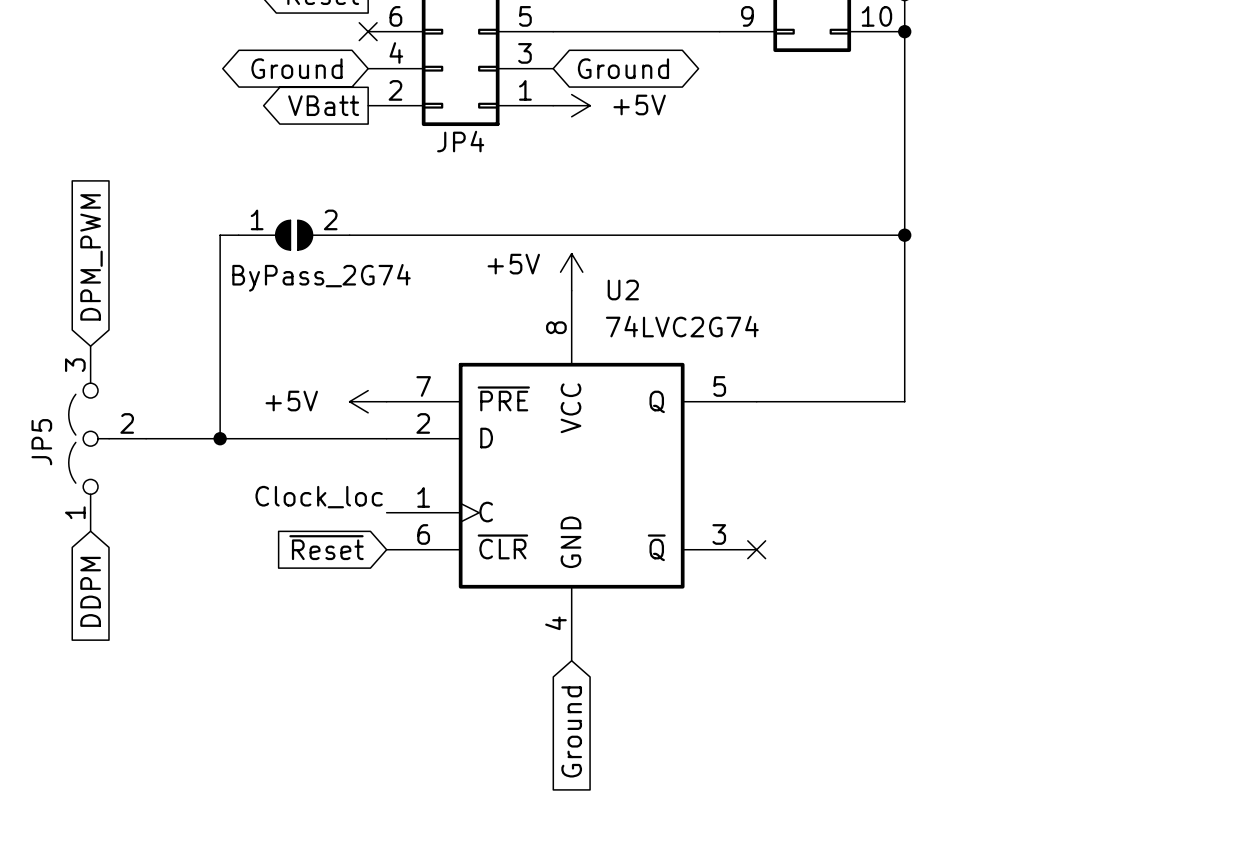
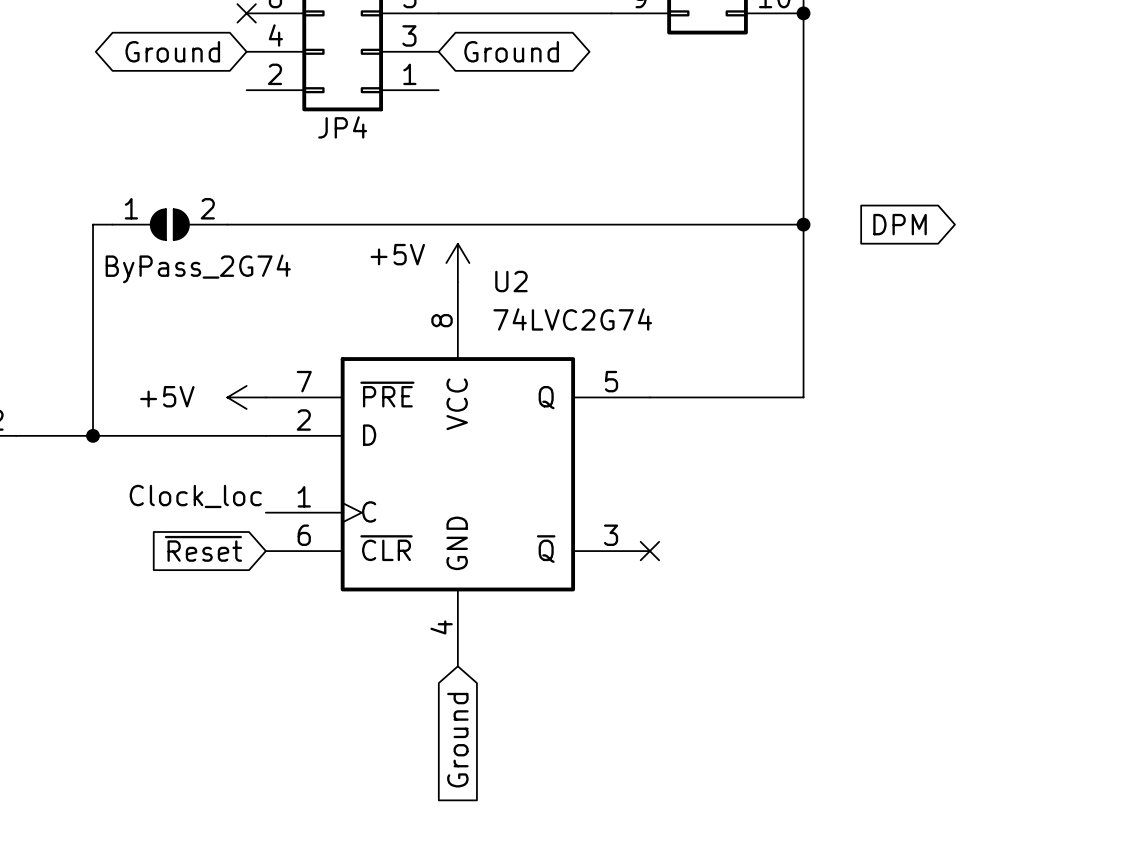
global label: VBatt (323, 105) -> none
power symbol: +5V (571, 105) -> none
global label: none -> DPM (900, 224)

